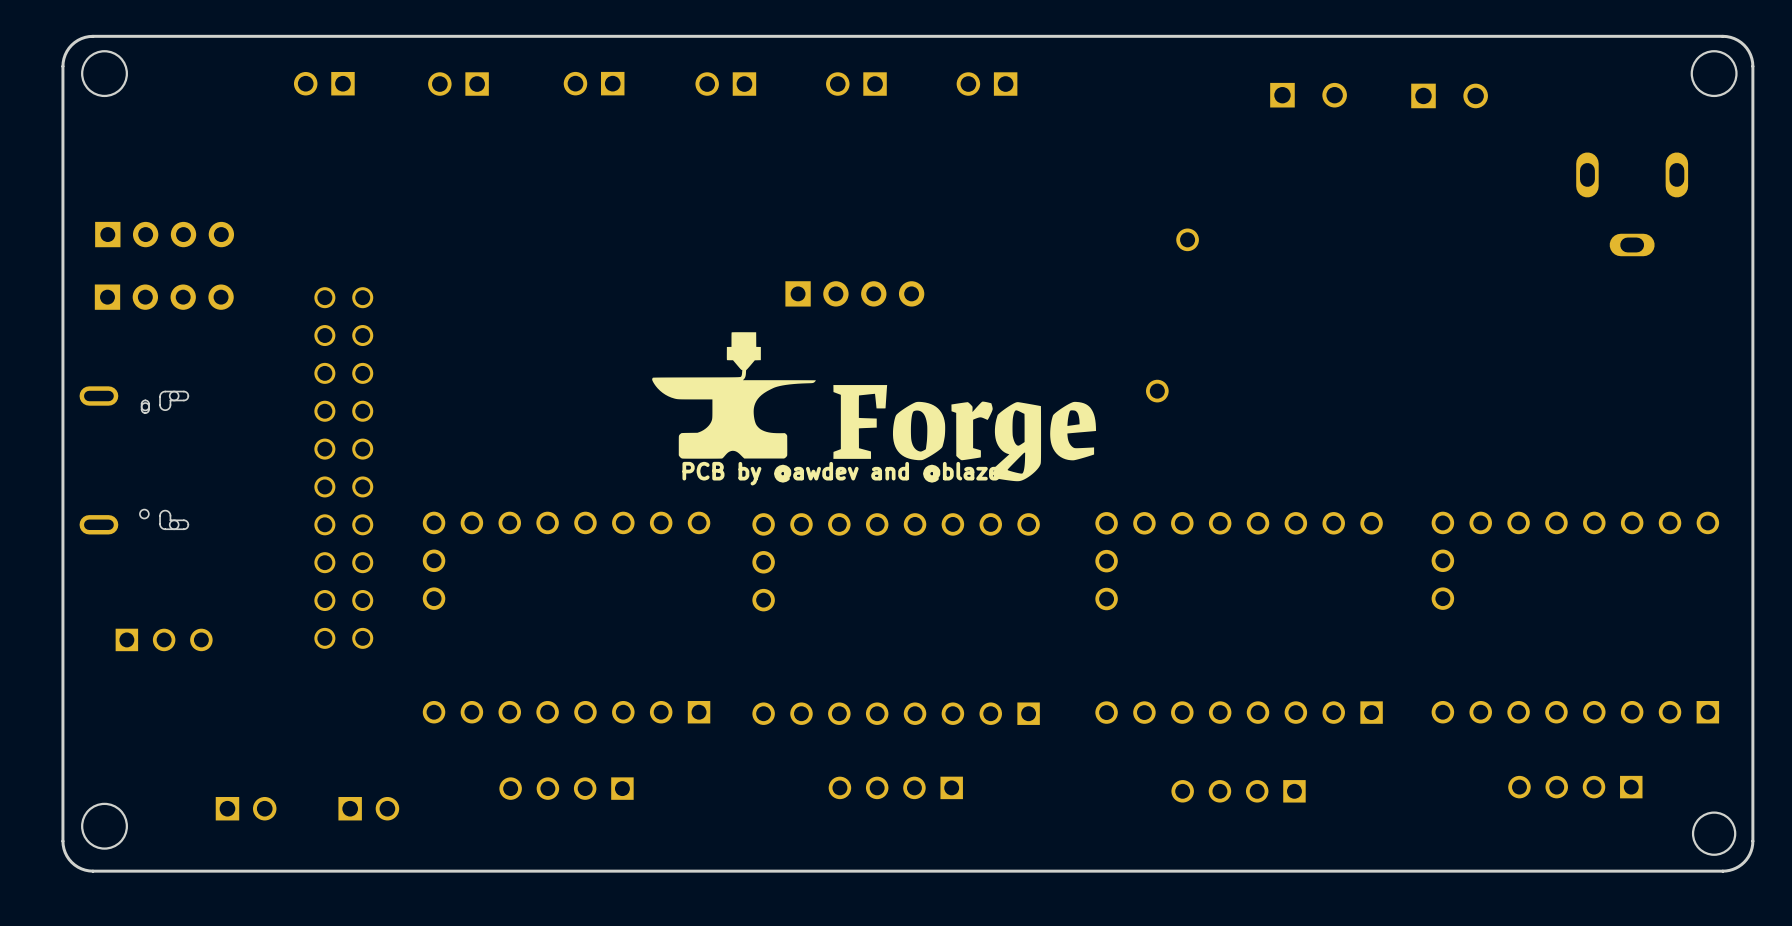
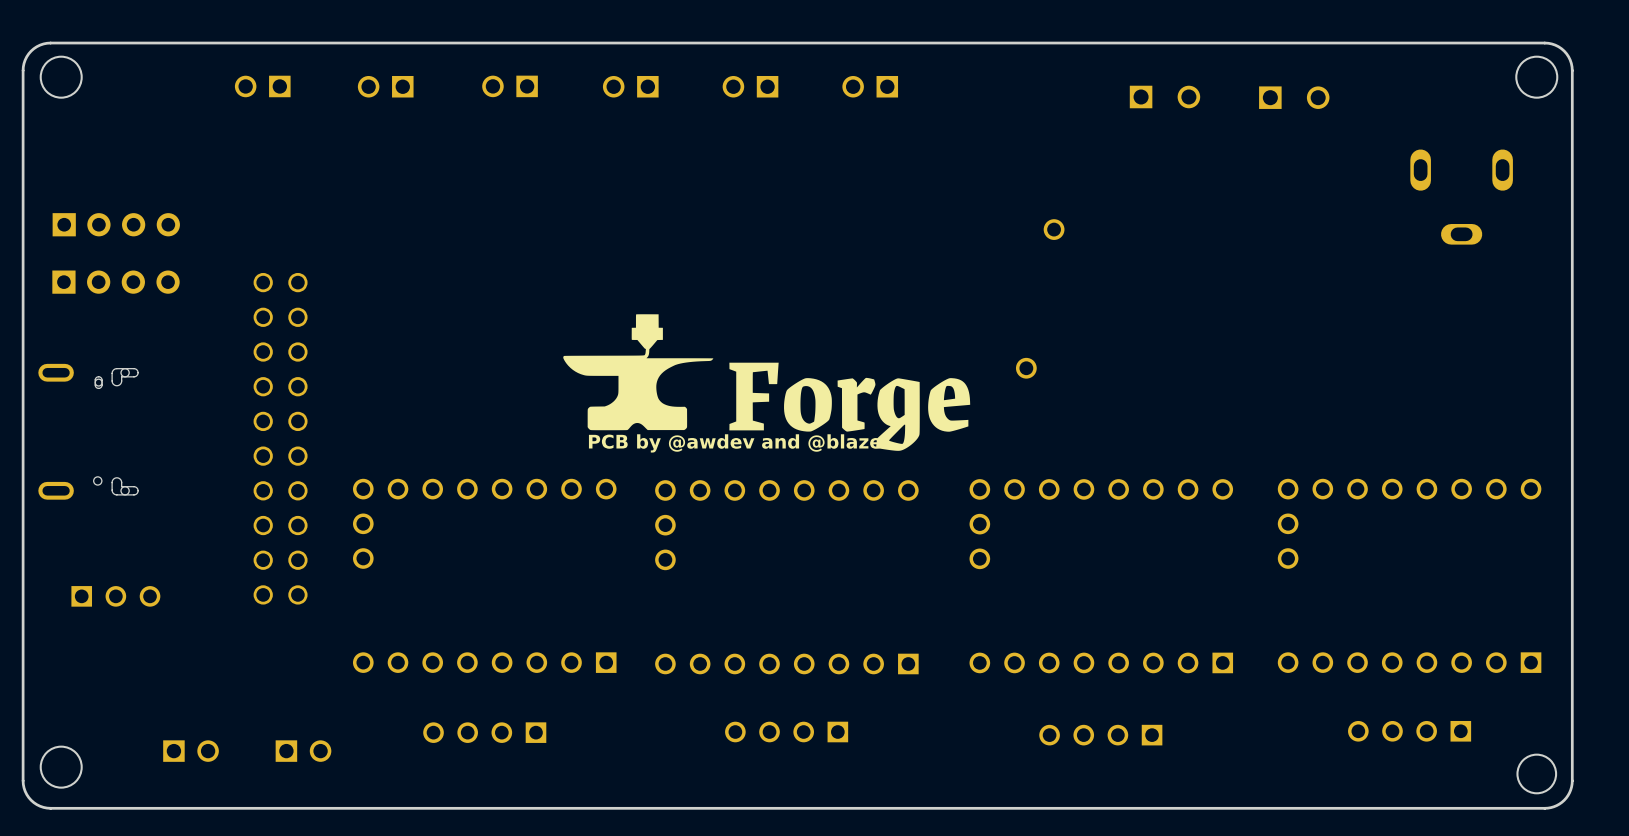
part: (854, 293) -> none

